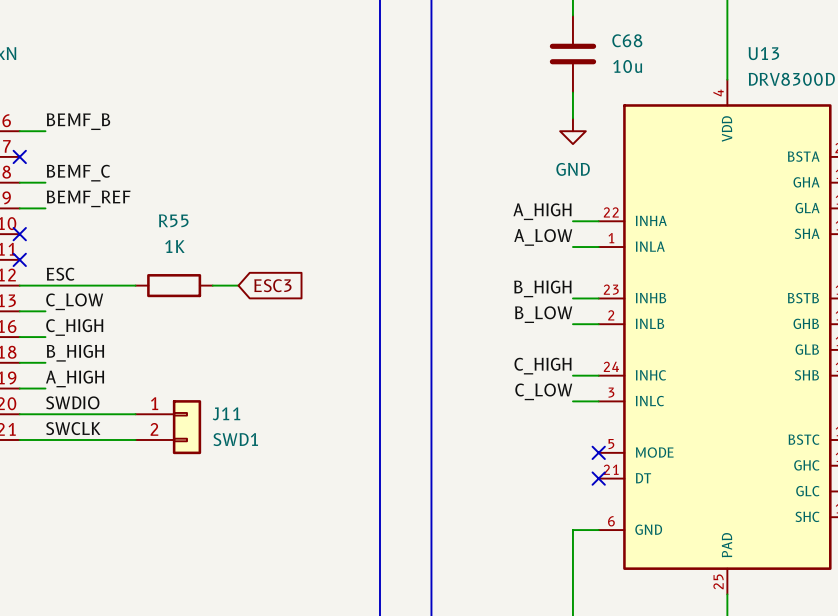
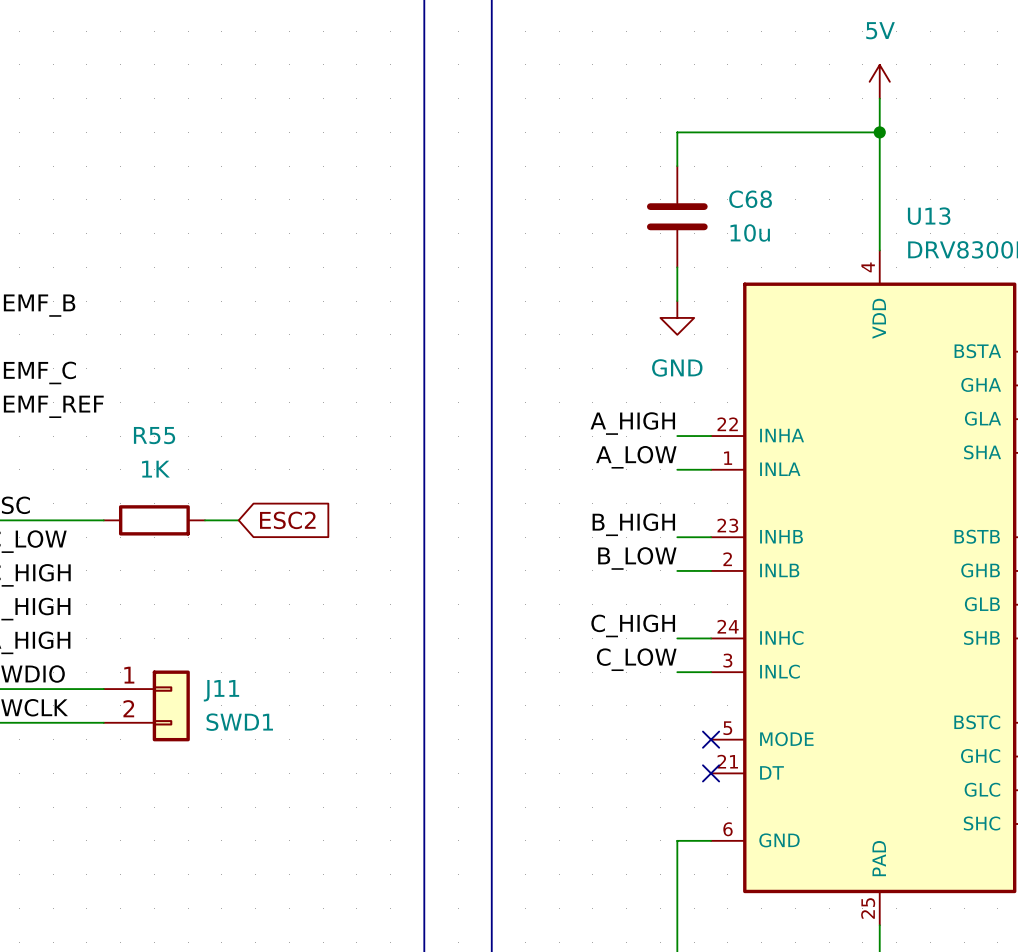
global label: ESC3 (272, 285) -> ESC2 (287, 520)

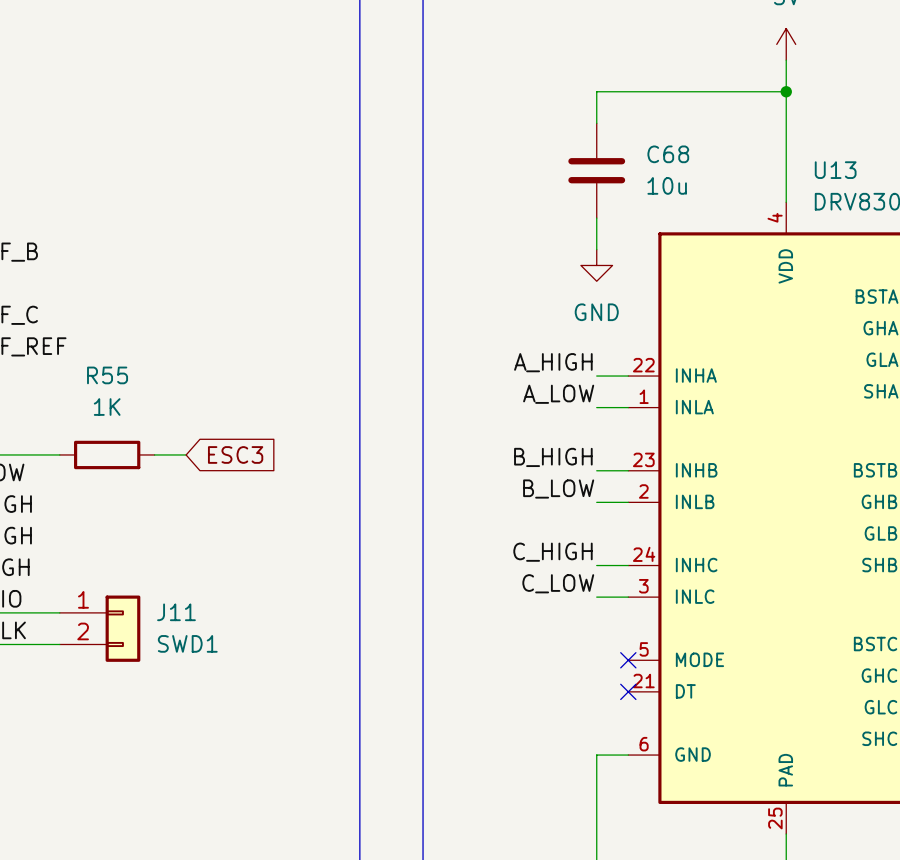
global label: ESC2 (287, 520) -> ESC3 (235, 454)

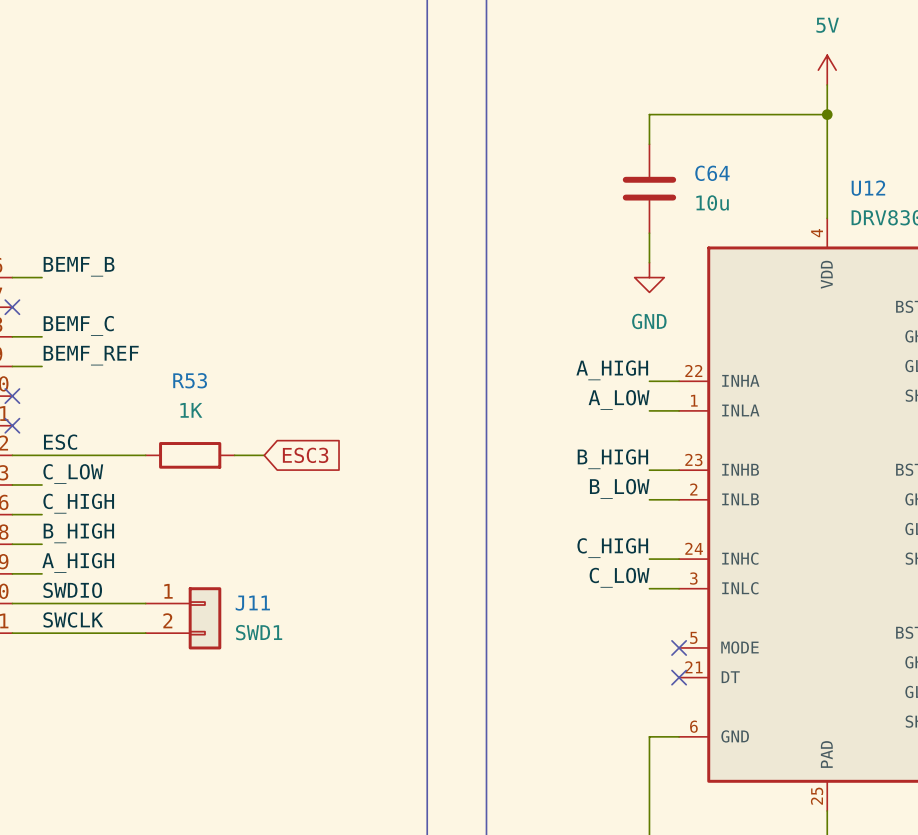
C68 name: C68 (668, 154) -> C64 (712, 173)
U13 name: U13 (835, 170) -> U12 (868, 188)
R55 name: R55 (107, 375) -> R53 (190, 380)

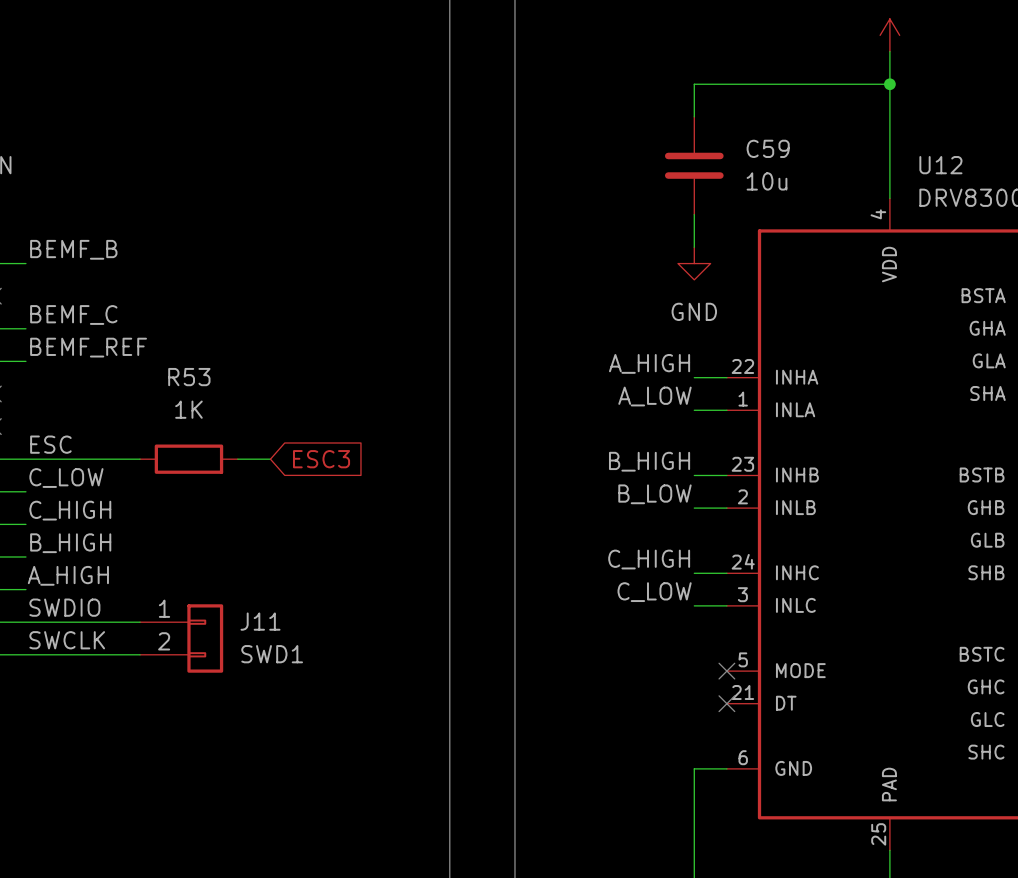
C64 name: C64 (712, 173) -> C59 (768, 148)

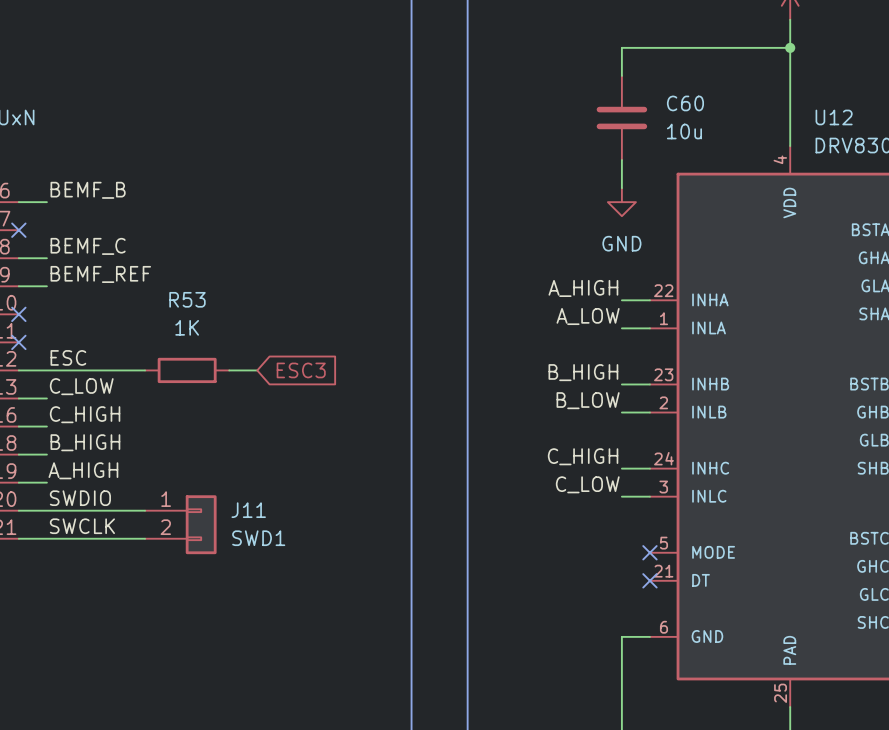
C59 name: C59 (768, 148) -> C60 (685, 103)

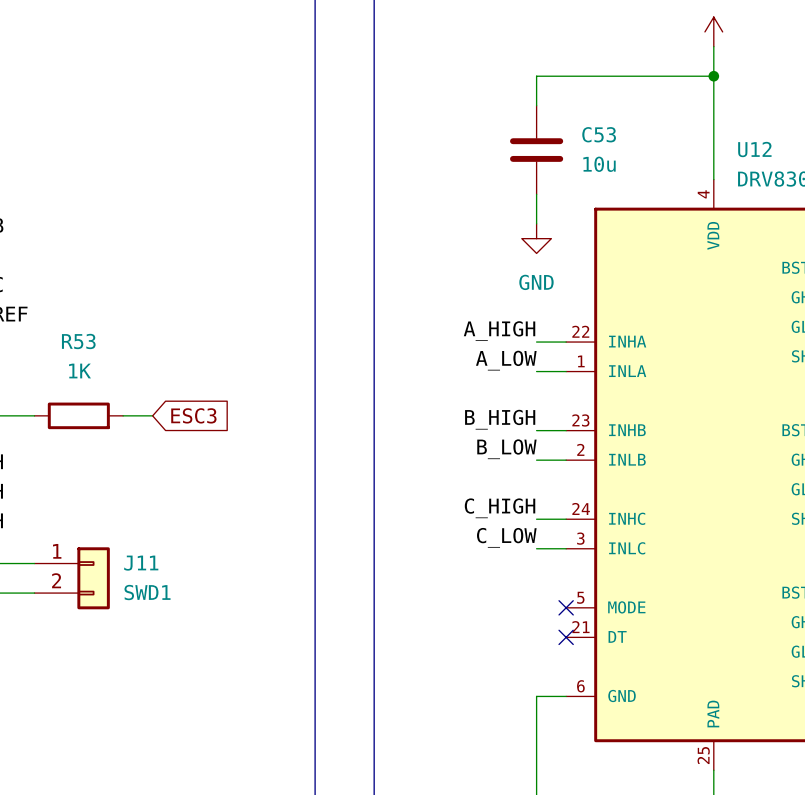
C60 name: C60 (685, 103) -> C53 (599, 134)

